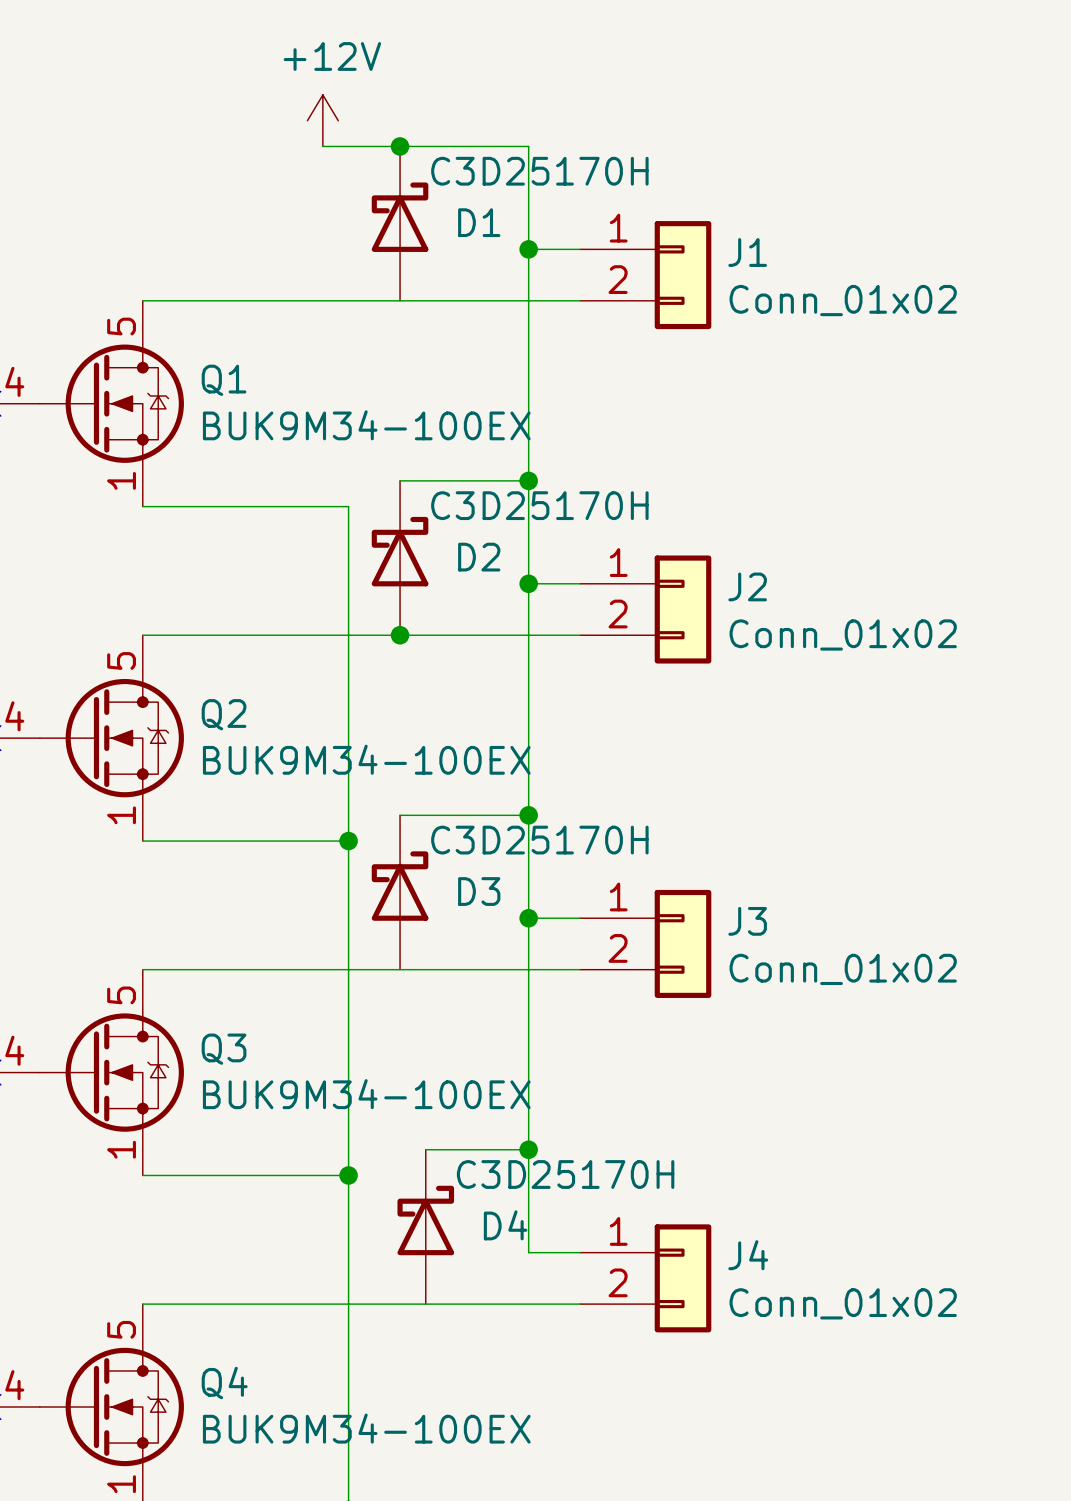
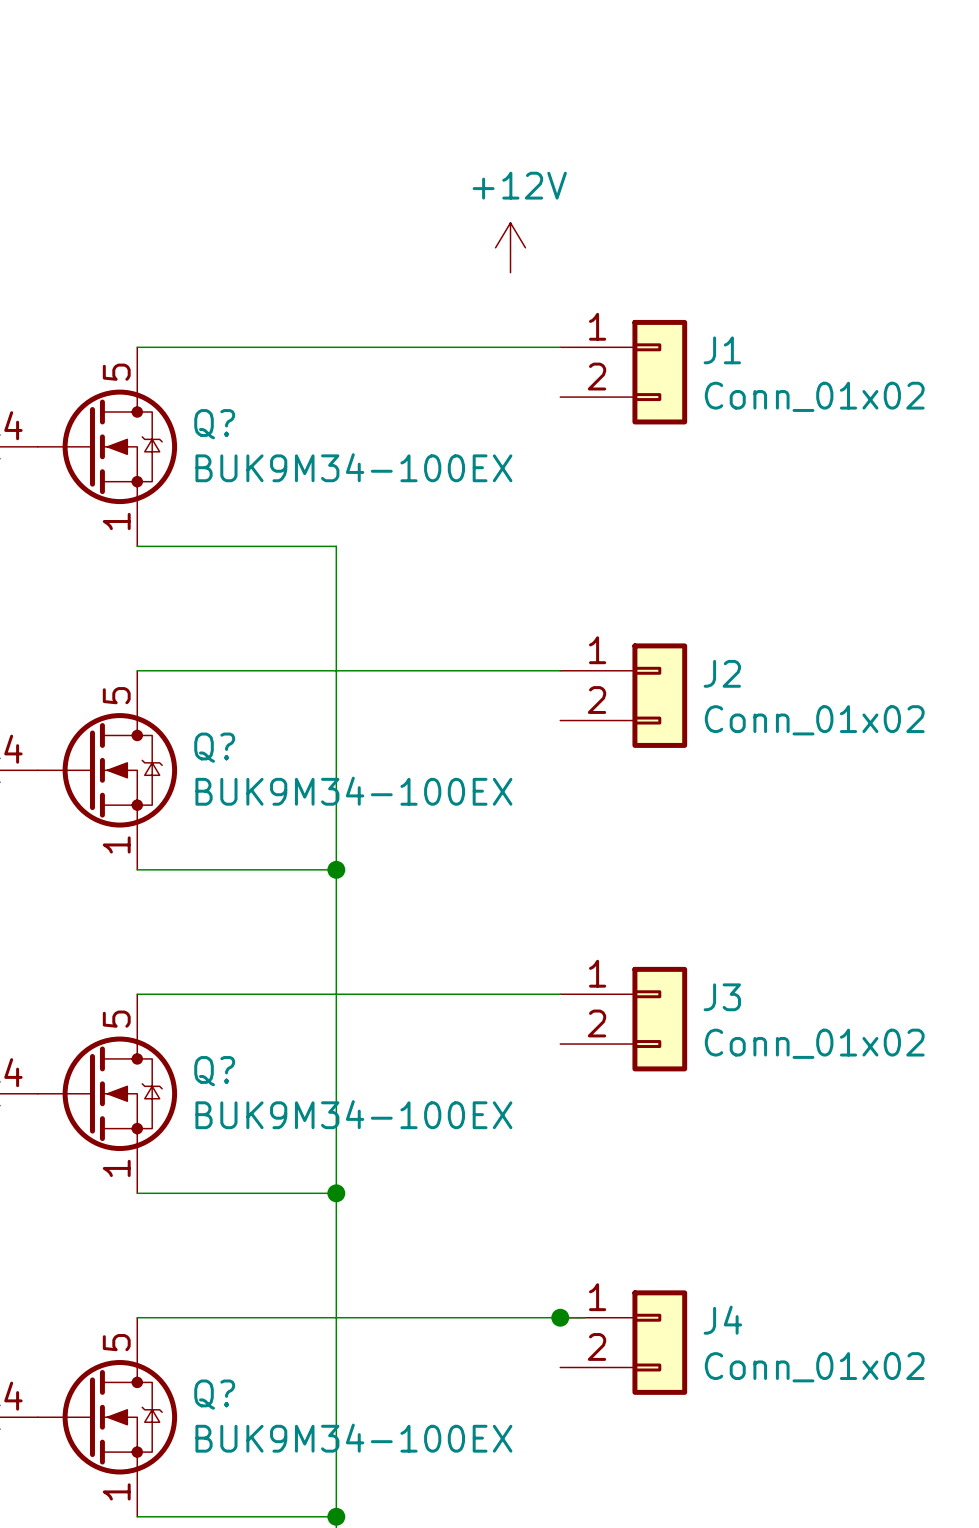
power symbol position: +12V (322, 120) -> +12V (510, 247)
wire: (322, 146) (528, 146) (528, 1252) (580, 1252) -> none
junction: (400, 146) -> none
D1: C3D25170H (400, 223) -> none
wire: (528, 249) (580, 249) -> none
junction: (528, 249) -> none
J1 position: (645, 275) -> (623, 372)
Q1 name: Q1 (224, 380) -> Q? (214, 424)
wire: (400, 480) (528, 480) -> none
junction: (528, 480) -> none
D2: C3D25170H (400, 558) -> none
wire: (528, 583) (580, 583) -> none
junction: (528, 583) -> none
J2 position: (645, 609) -> (623, 695)
junction: (400, 635) -> none
Q2 name: Q2 (224, 714) -> Q? (214, 747)
wire: (400, 815) (528, 815) -> none
junction: (528, 815) -> none
D3: C3D25170H (400, 892) -> none
wire: (528, 918) (580, 918) -> none
junction: (528, 918) -> none
J3 position: (645, 943) -> (623, 1019)
Q3 name: Q3 (224, 1049) -> Q? (214, 1071)
wire: (425, 1149) (528, 1149) -> none
junction: (528, 1149) -> none
D4: C3D25170H (425, 1226) -> none
J4 position: (645, 1278) -> (623, 1342)
junction: none -> (560, 1317)
Q4 name: Q4 (224, 1382) -> Q? (214, 1394)

